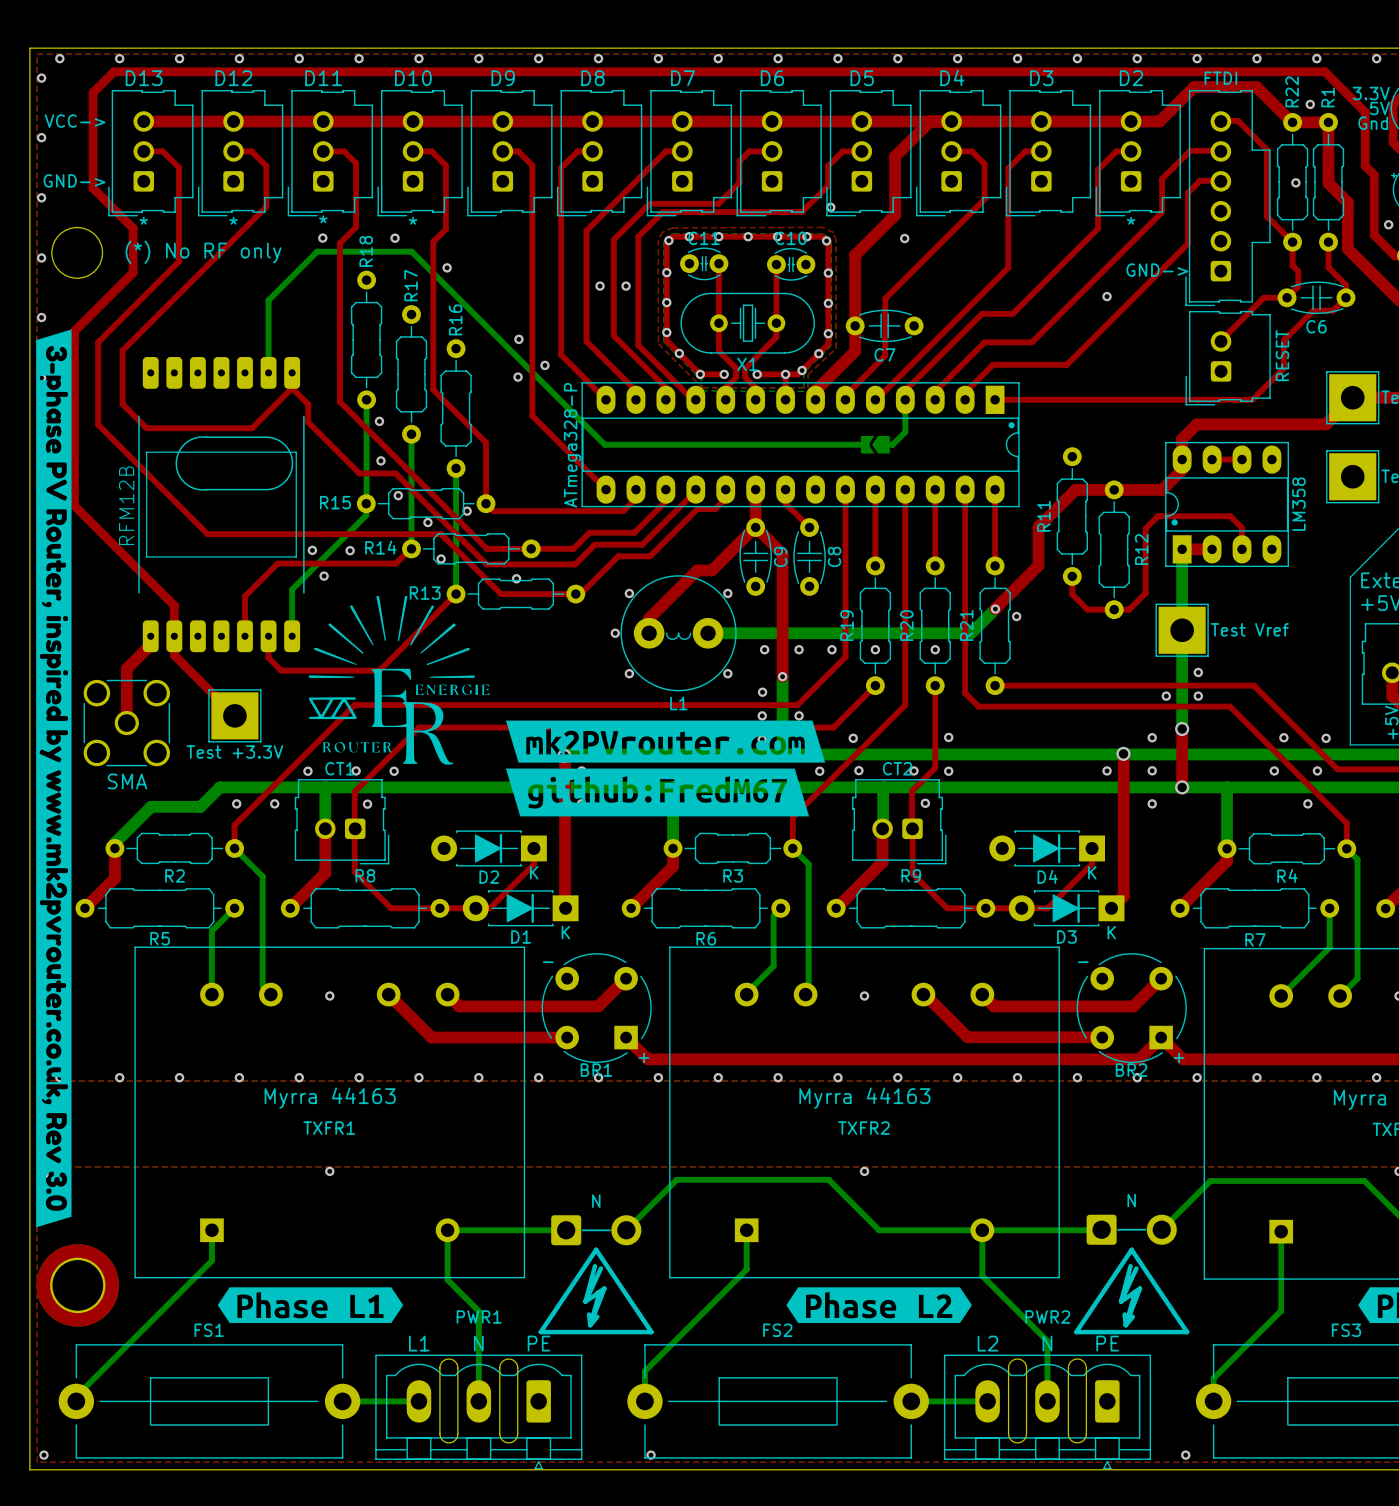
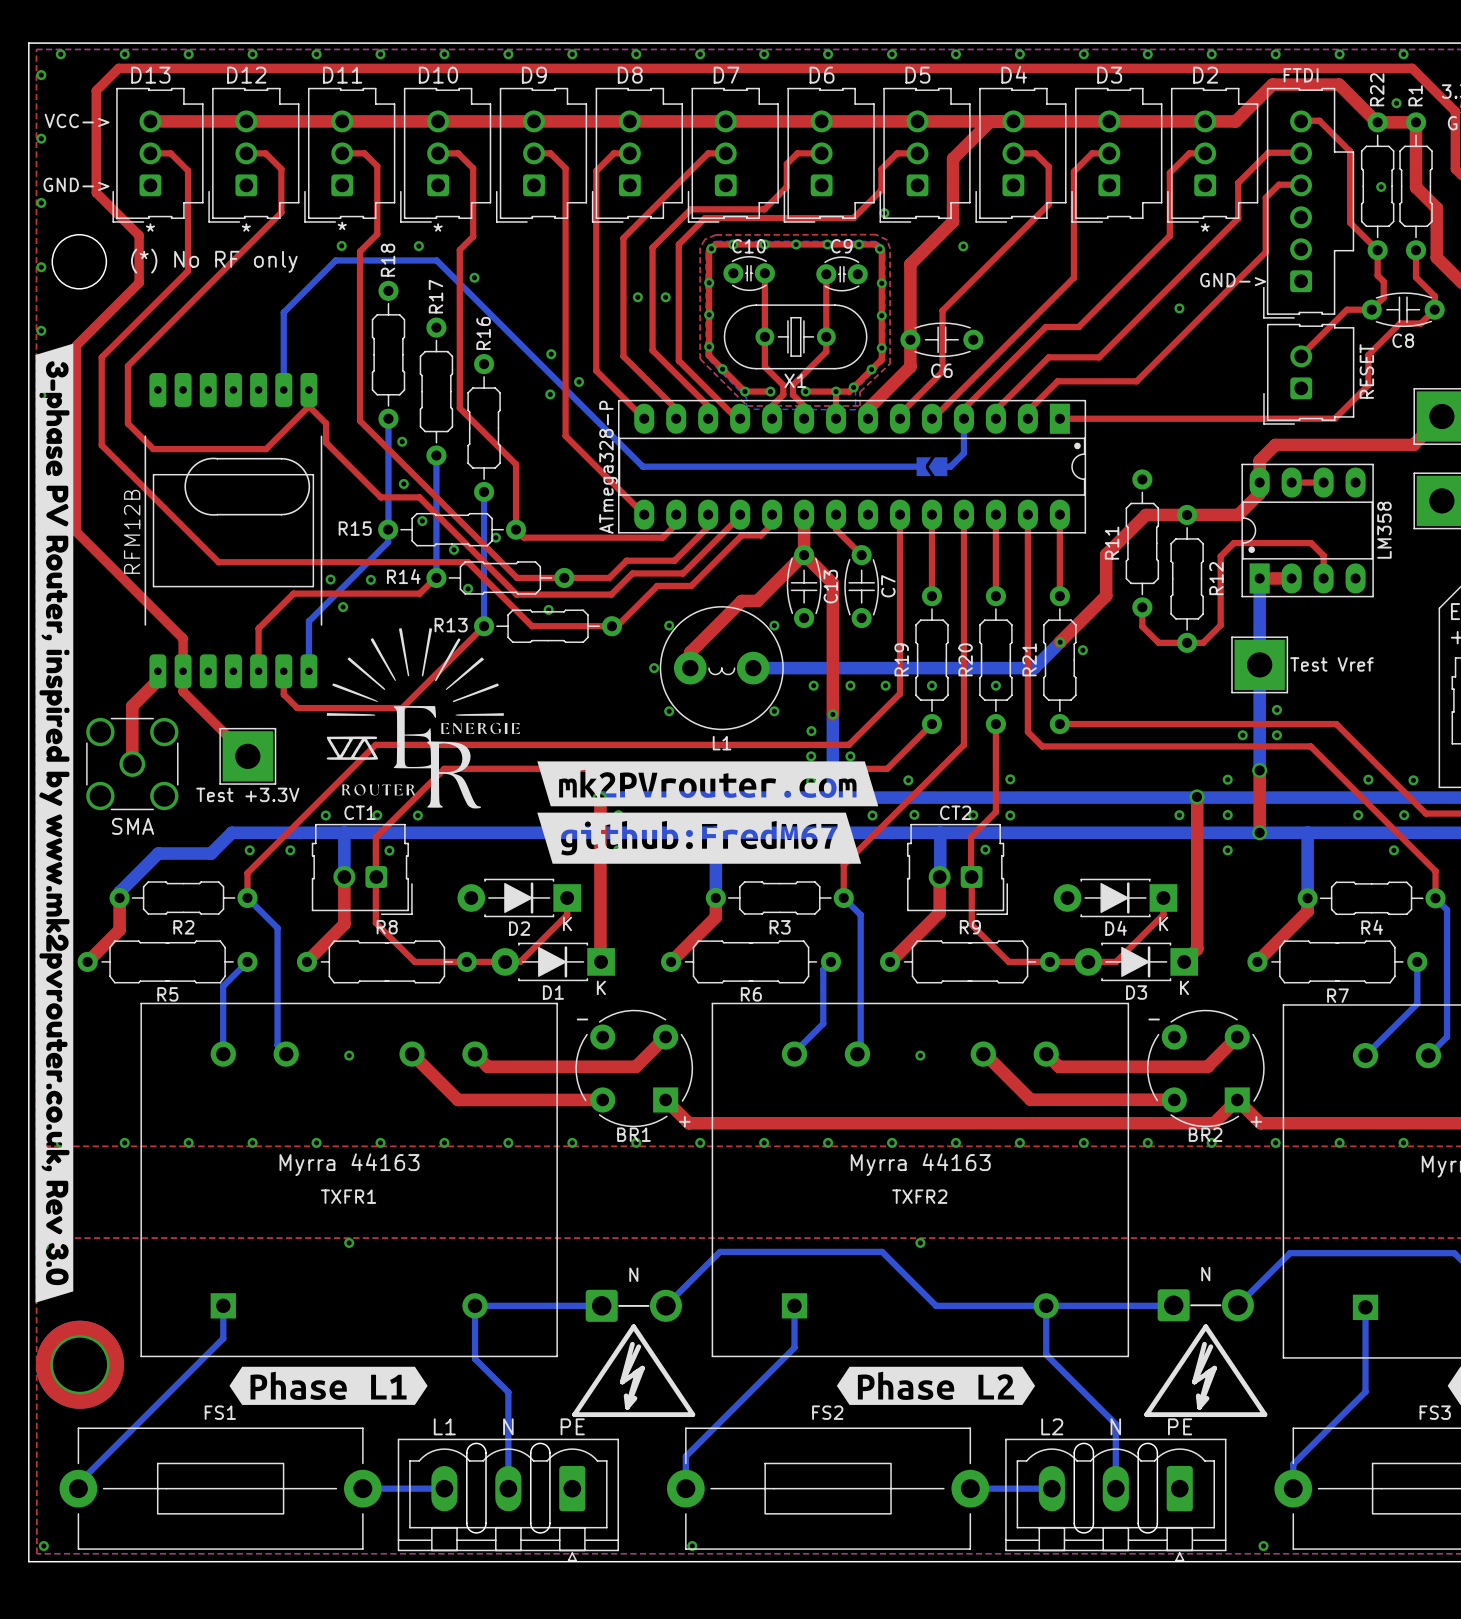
C11 name: C11 (704, 238) -> C10 (748, 246)
C10 name: C10 (790, 238) -> C9 (841, 246)
C6 name: C6 (1316, 326) -> C8 (1403, 340)
C7 name: C7 (884, 354) -> C6 (941, 370)
C9 name: C9 (780, 556) -> C13 (830, 586)
C8 name: C8 (834, 556) -> C7 (888, 586)
PWR1 name: PWR1 (479, 1316) -> none
PWR2 name: PWR2 (1047, 1316) -> none

